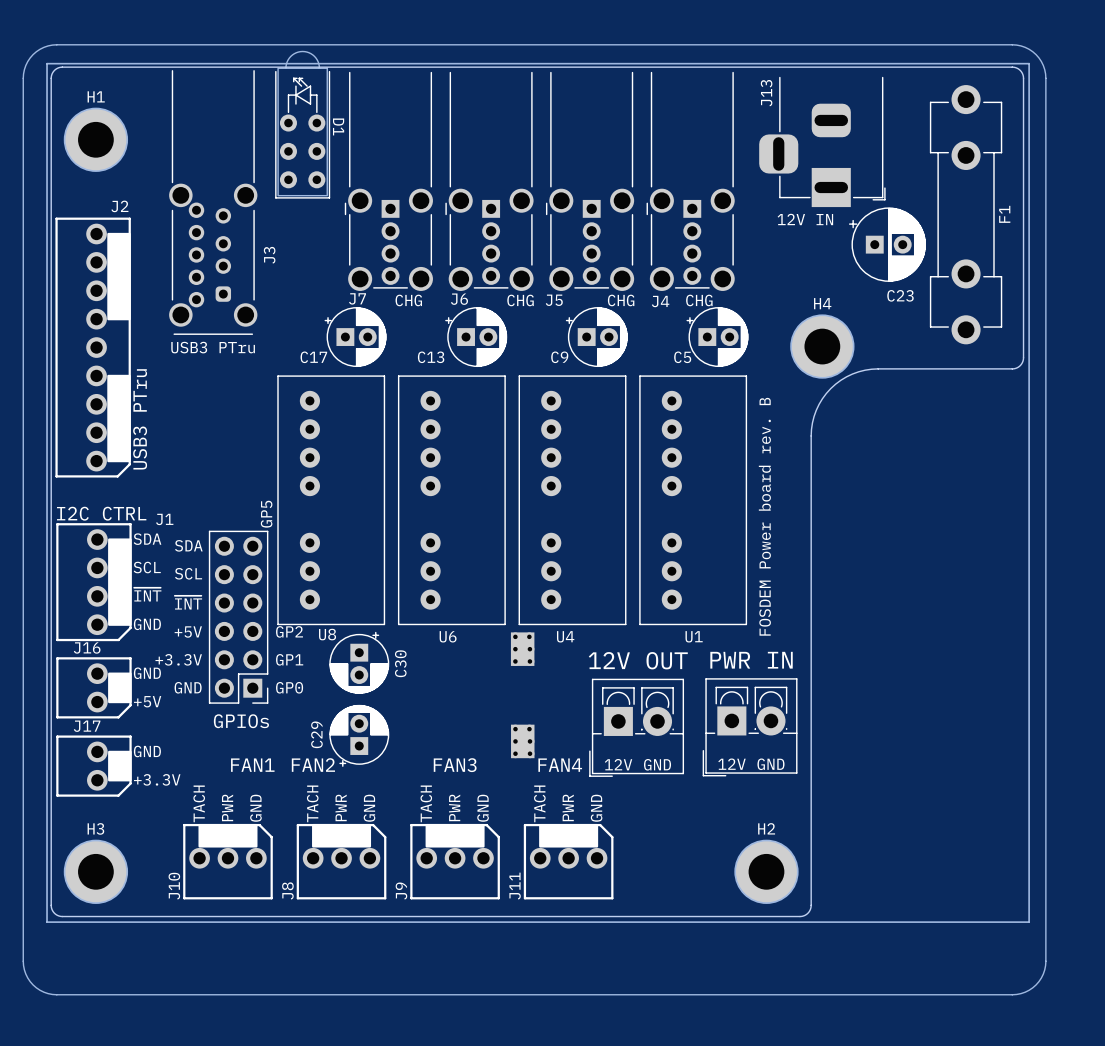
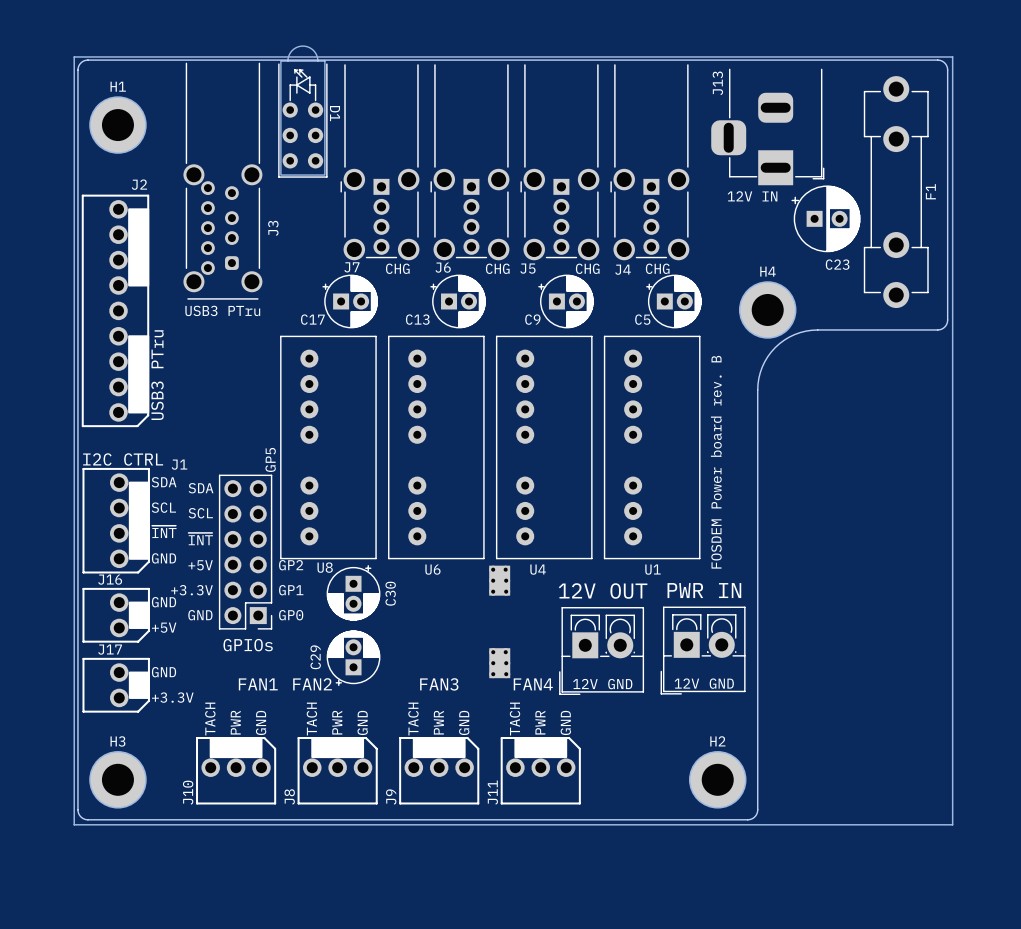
line: (56, 44) (1012, 44) (1025, 47) (1036, 54) (1043, 65) (1045, 78) (1045, 961) (1043, 974) (1036, 984) (1025, 992) (1012, 994) (56, 994) (43, 992) (33, 984) (25, 974) (23, 961) (23, 78) (25, 65) (33, 54) (43, 47) (56, 44) -> none

